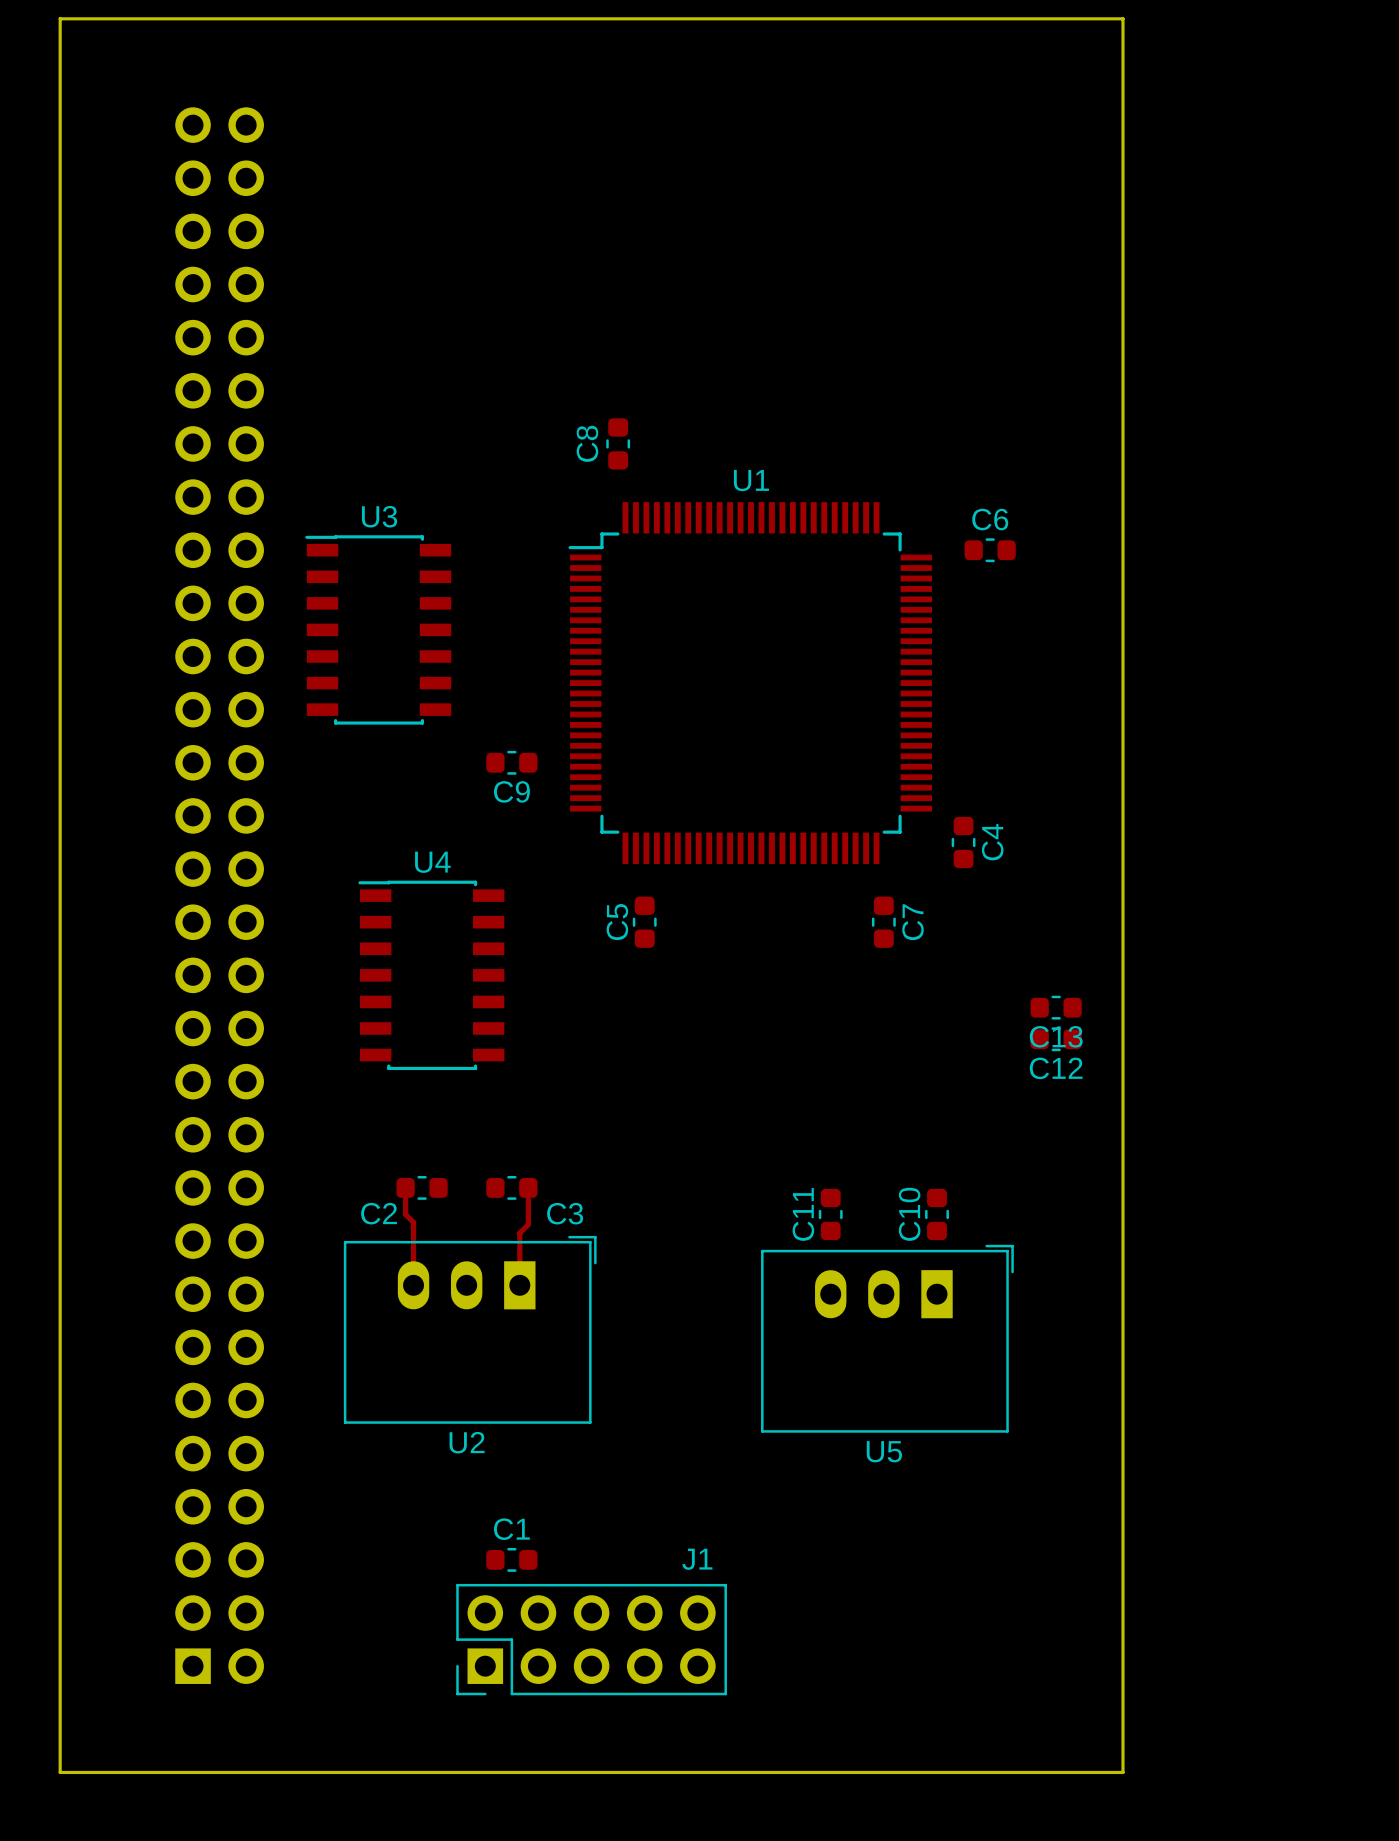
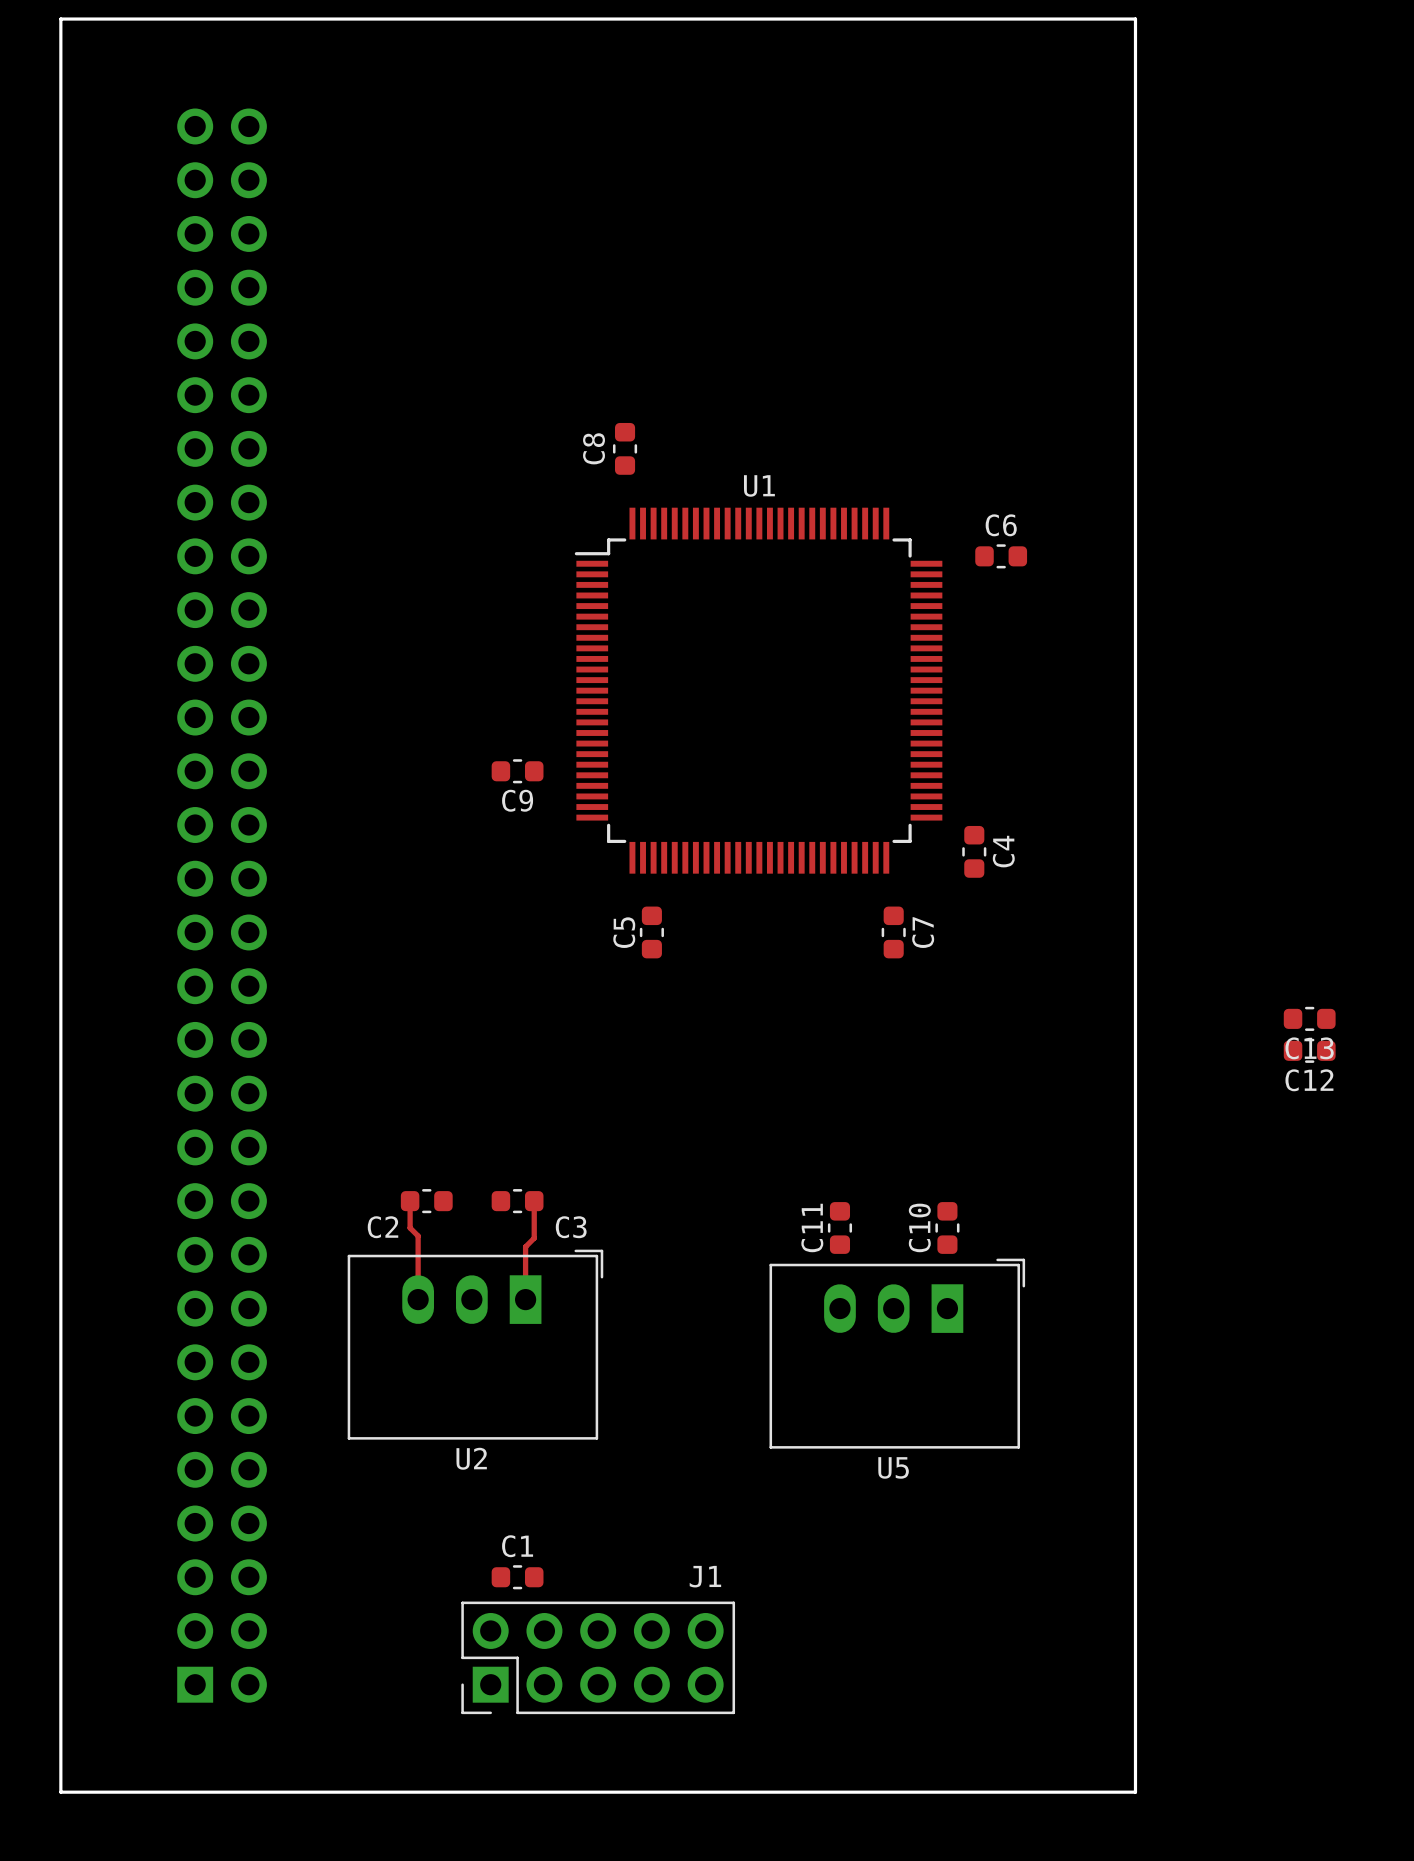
U3: (378, 629) -> none
U4: (431, 975) -> none
C13 position: (1056, 1007) -> (1309, 1018)
C12 position: (1056, 1039) -> (1309, 1050)

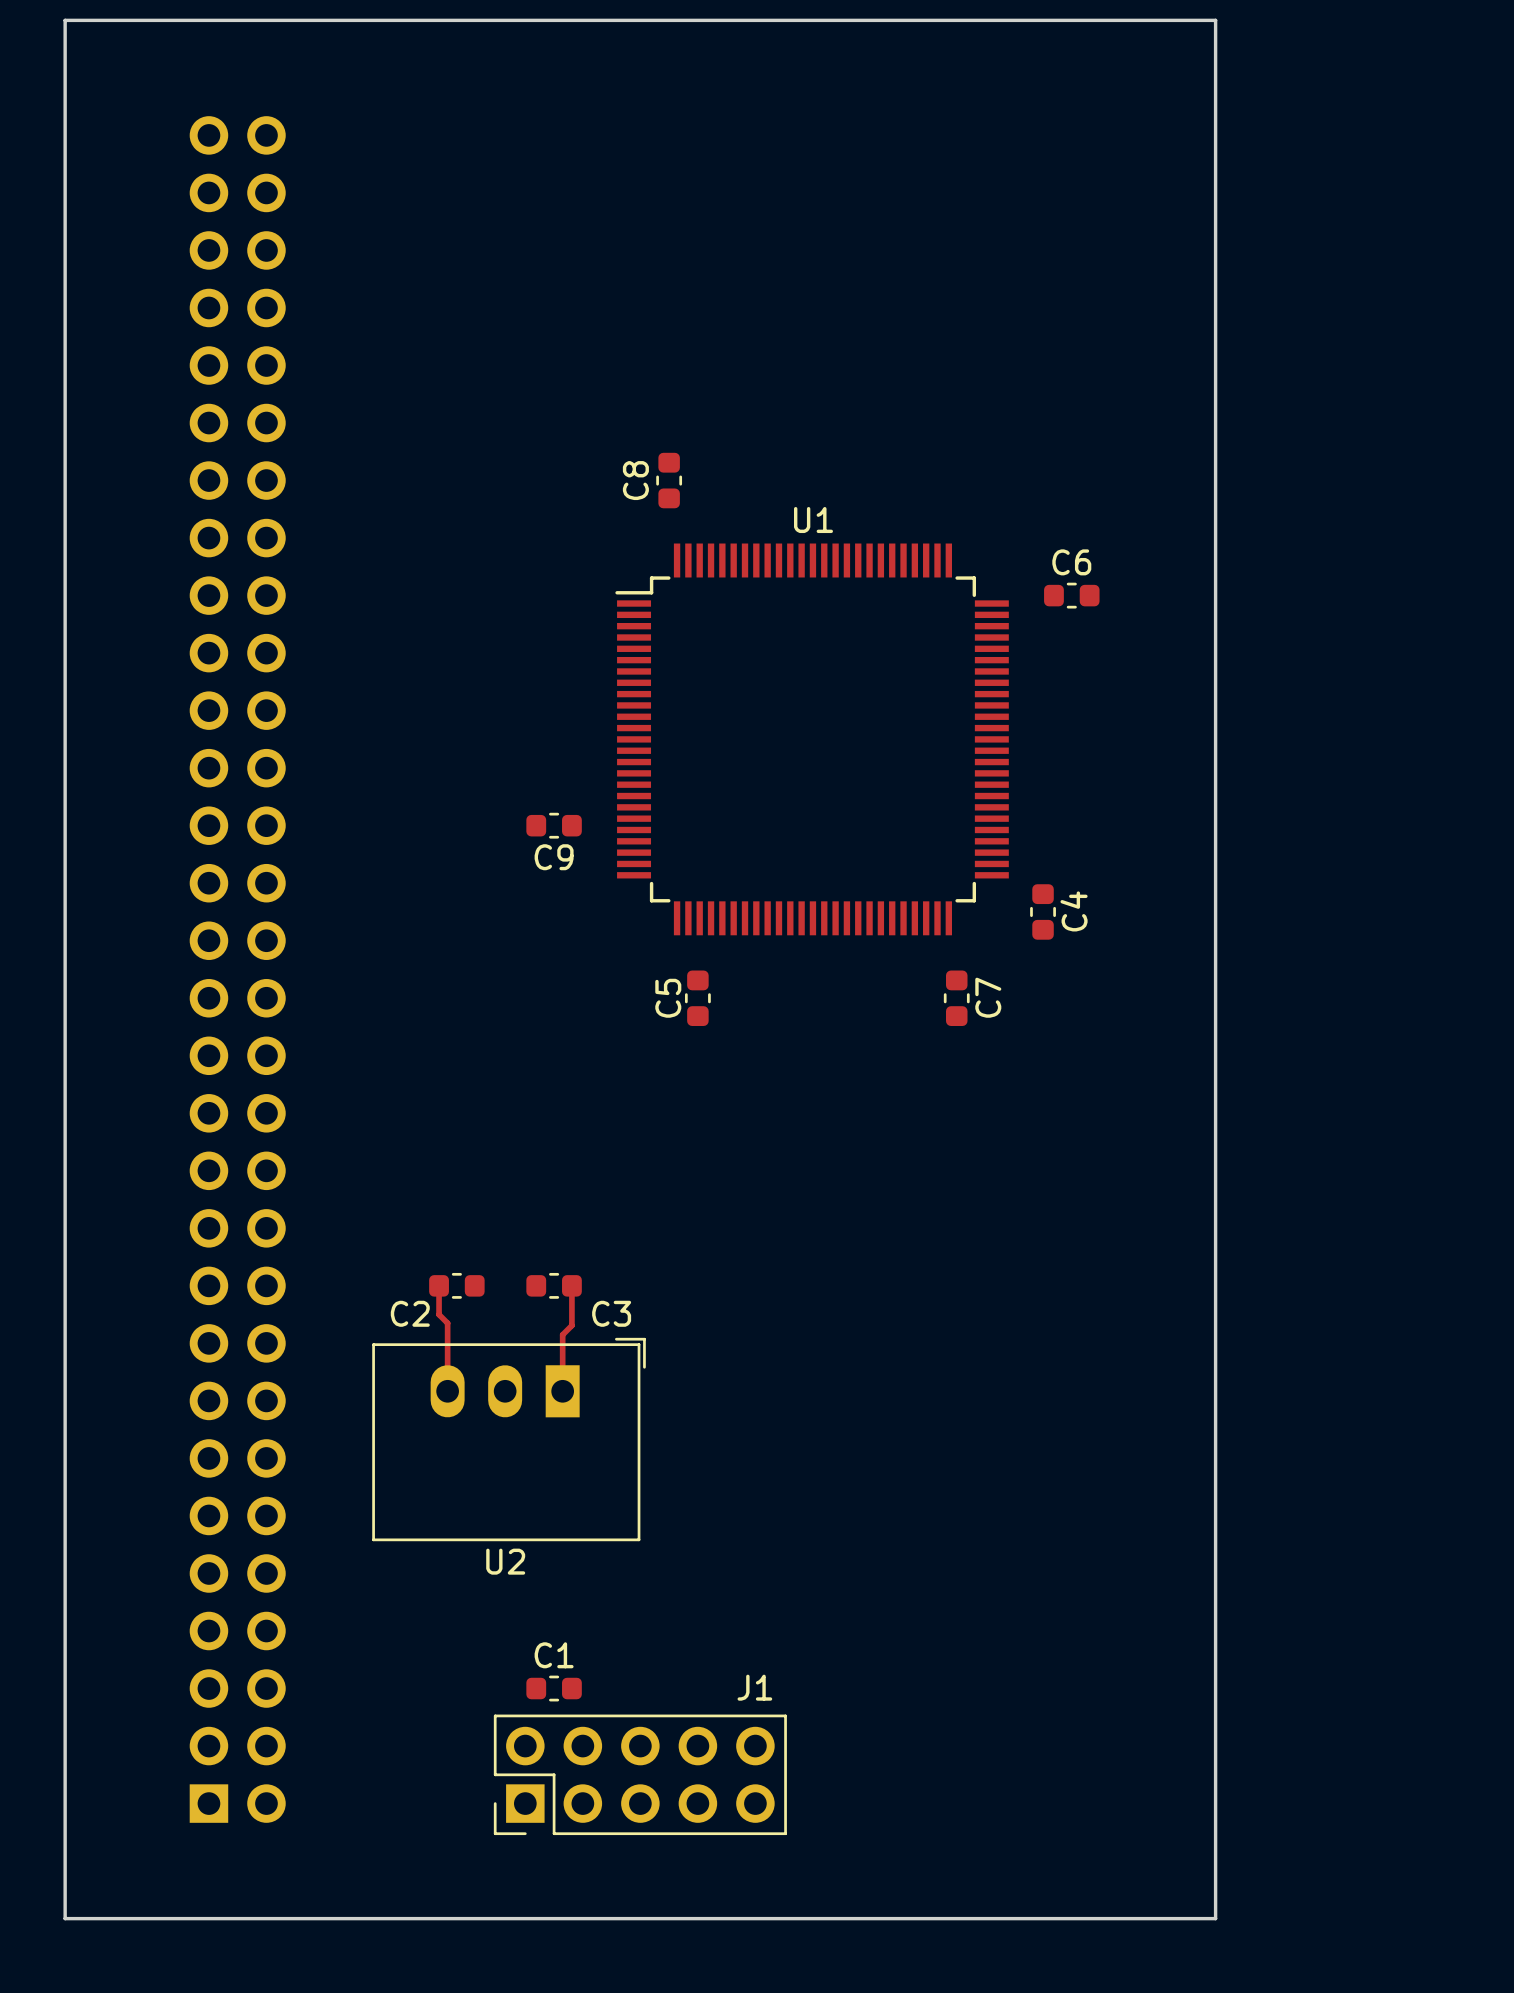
C13: (1309, 1018) -> none
C12: (1309, 1050) -> none
C11: (839, 1227) -> none
C10: (947, 1227) -> none
U5: (897, 1353) -> none

